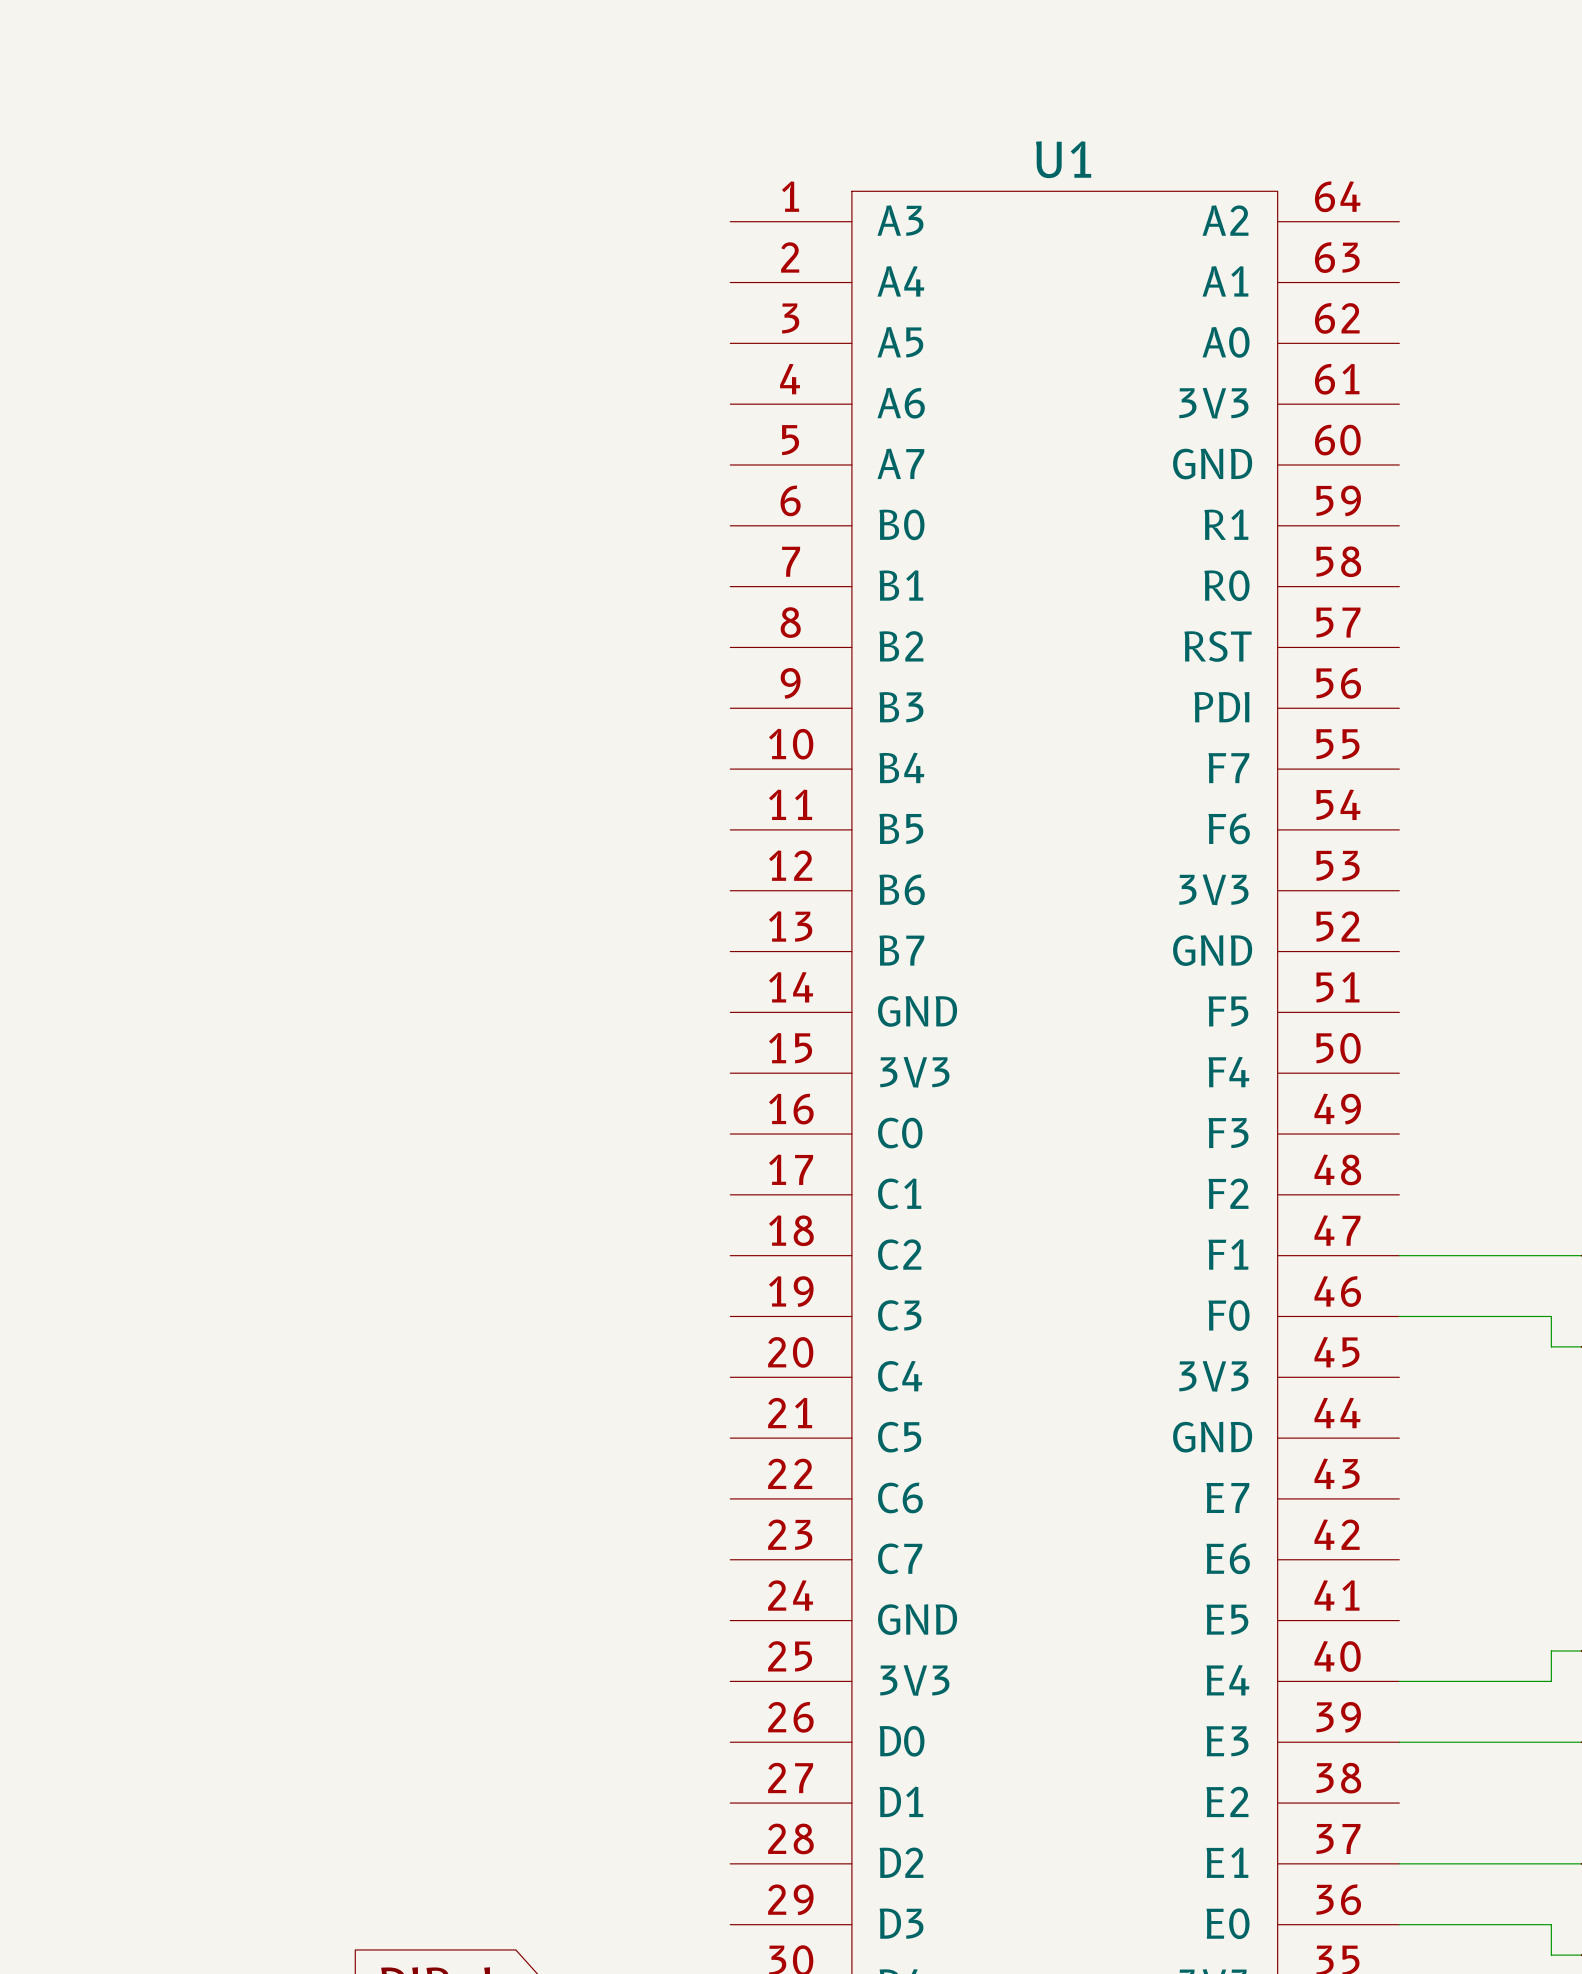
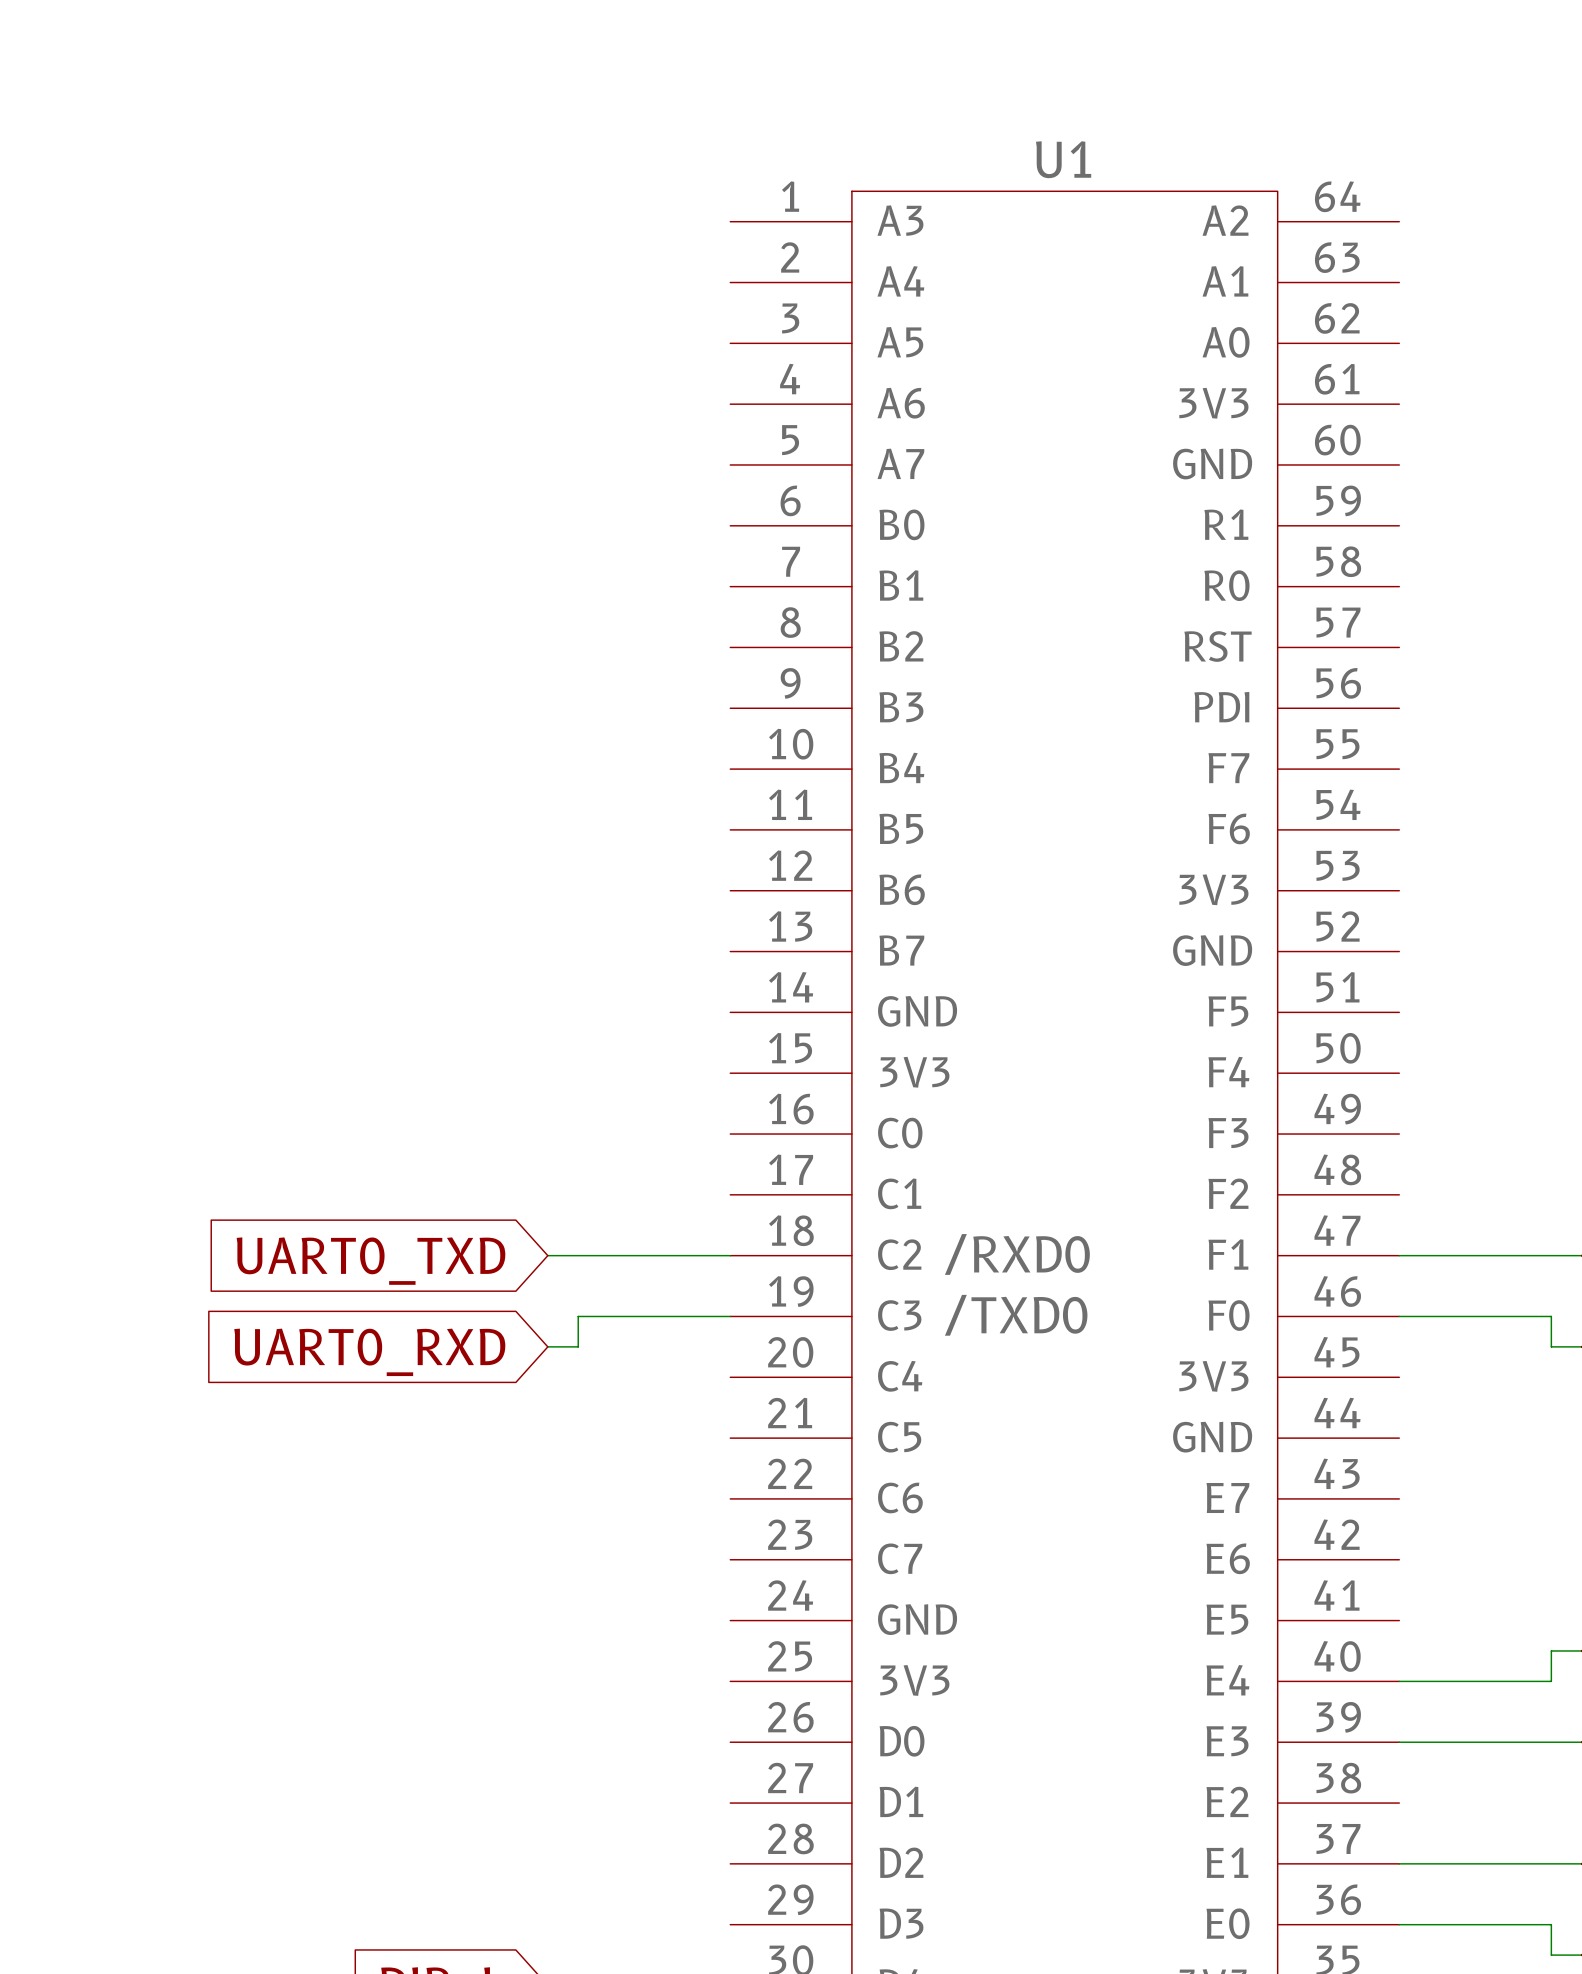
label: none -> /RXD0 (1017, 1254)
wire: none -> (547, 1255) (730, 1255)
global label: none -> UART0_TXD (371, 1261)
label: none -> /TXD0 (1016, 1315)
wire: none -> (730, 1316) (578, 1316) (578, 1346) (547, 1346)
global label: none -> UART0_RXD (369, 1352)

